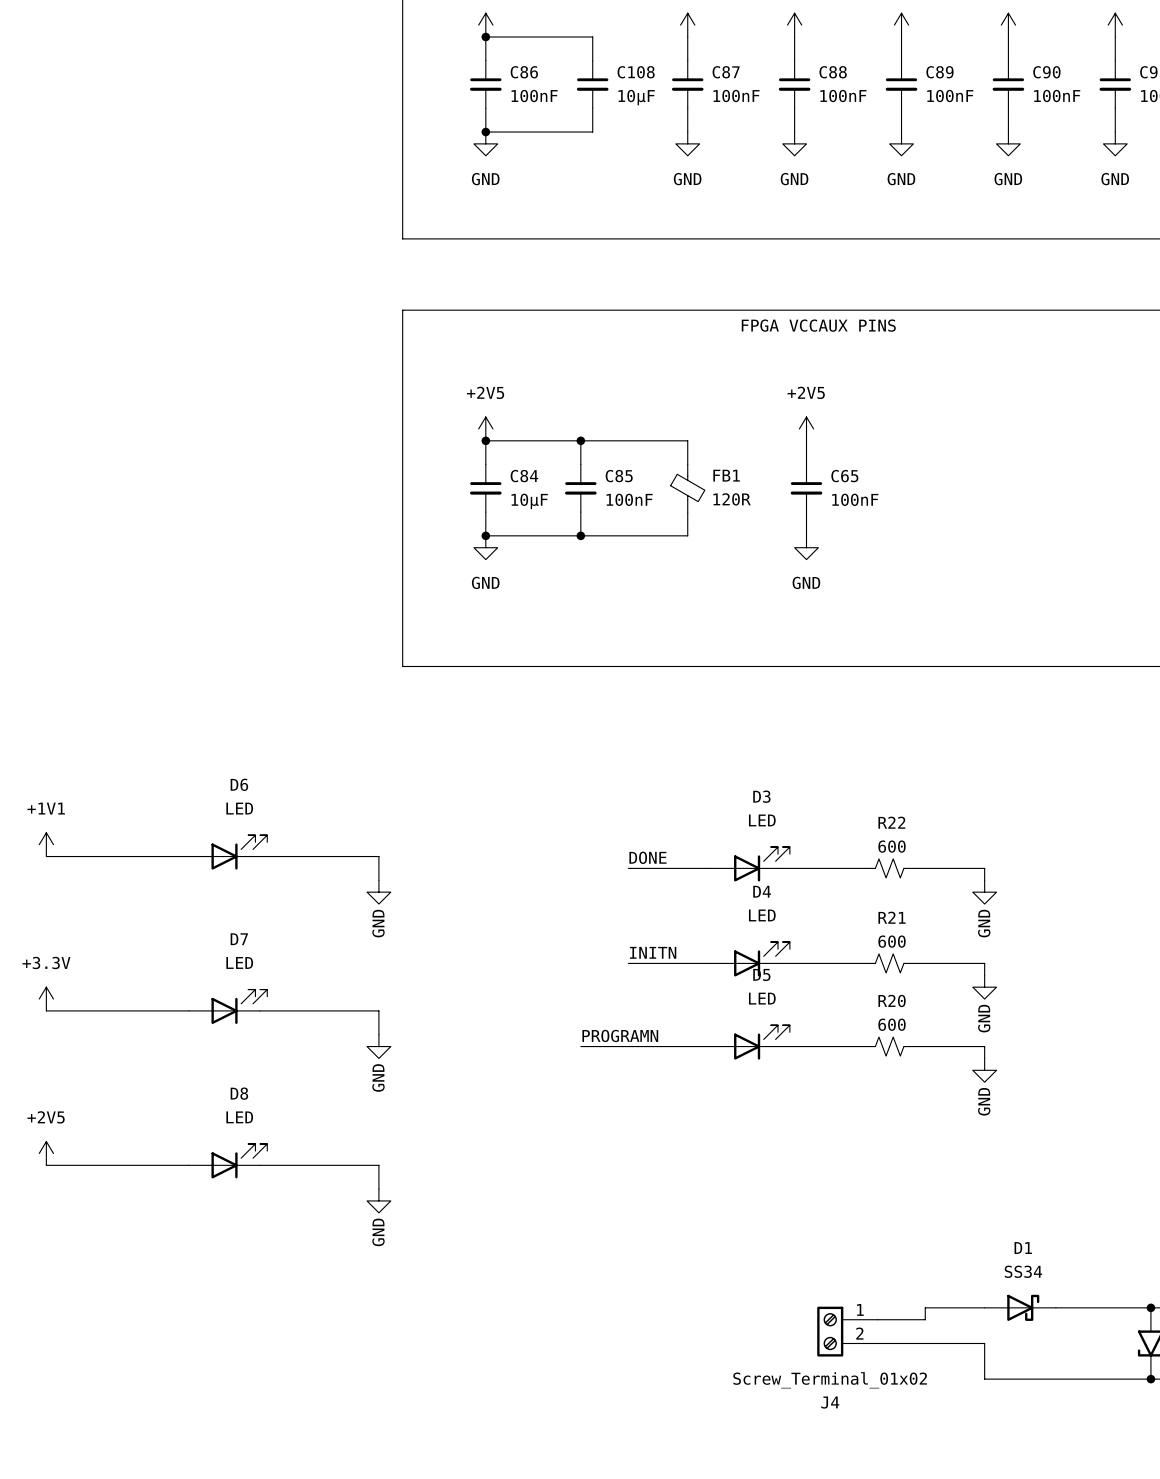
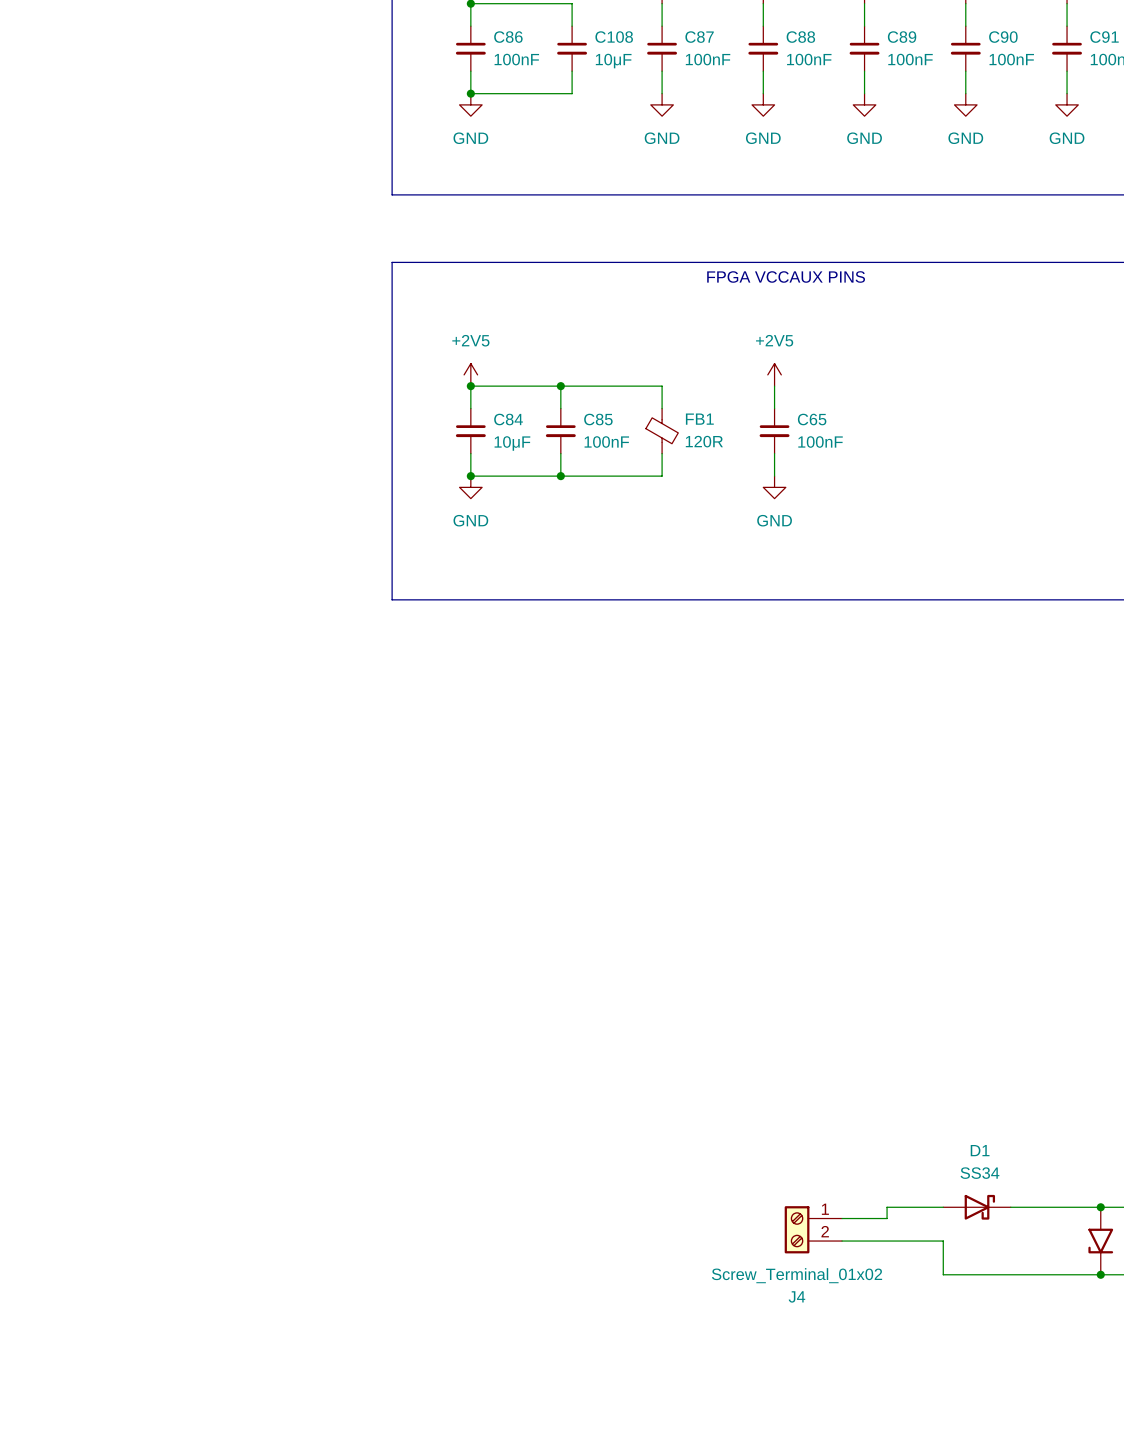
power symbol: +1V1 (46, 844) -> none
D6: LED (228, 852) -> none
wire: (46, 856) (188, 856) -> none
wire: (260, 856) (378, 856) (378, 880) -> none
label: DONE (647, 857) -> none
D3: LED (750, 864) -> none
wire: (628, 868) (711, 868) -> none
wire: (782, 868) (865, 868) -> none
R22: 600 (889, 868) -> none
wire: (913, 868) (984, 868) (984, 880) -> none
power symbol: GND (378, 892) -> none
power symbol: GND (984, 892) -> none
label: INITN (653, 952) -> none
D4: LED (750, 959) -> none
wire: (628, 963) (711, 963) -> none
wire: (782, 963) (865, 963) -> none
R21: 600 (889, 963) -> none
wire: (913, 963) (984, 963) (984, 975) -> none
power symbol: GND (984, 987) -> none
power symbol: +3.3V (46, 999) -> none
D7: LED (228, 1006) -> none
wire: (46, 1010) (188, 1010) -> none
wire: (260, 1010) (378, 1010) (378, 1034) -> none
label: PROGRAMN (620, 1035) -> none
D5: LED (750, 1042) -> none
power symbol: GND (378, 1046) -> none
wire: (580, 1046) (711, 1046) -> none
wire: (782, 1046) (865, 1046) -> none
R20: 600 (889, 1046) -> none
wire: (913, 1046) (984, 1046) (984, 1058) -> none
power symbol: GND (984, 1070) -> none
power symbol: +2V5 (46, 1153) -> none
D8: LED (228, 1161) -> none
wire: (46, 1165) (188, 1165) -> none
wire: (260, 1165) (378, 1165) (378, 1189) -> none
power symbol: GND (378, 1200) -> none

